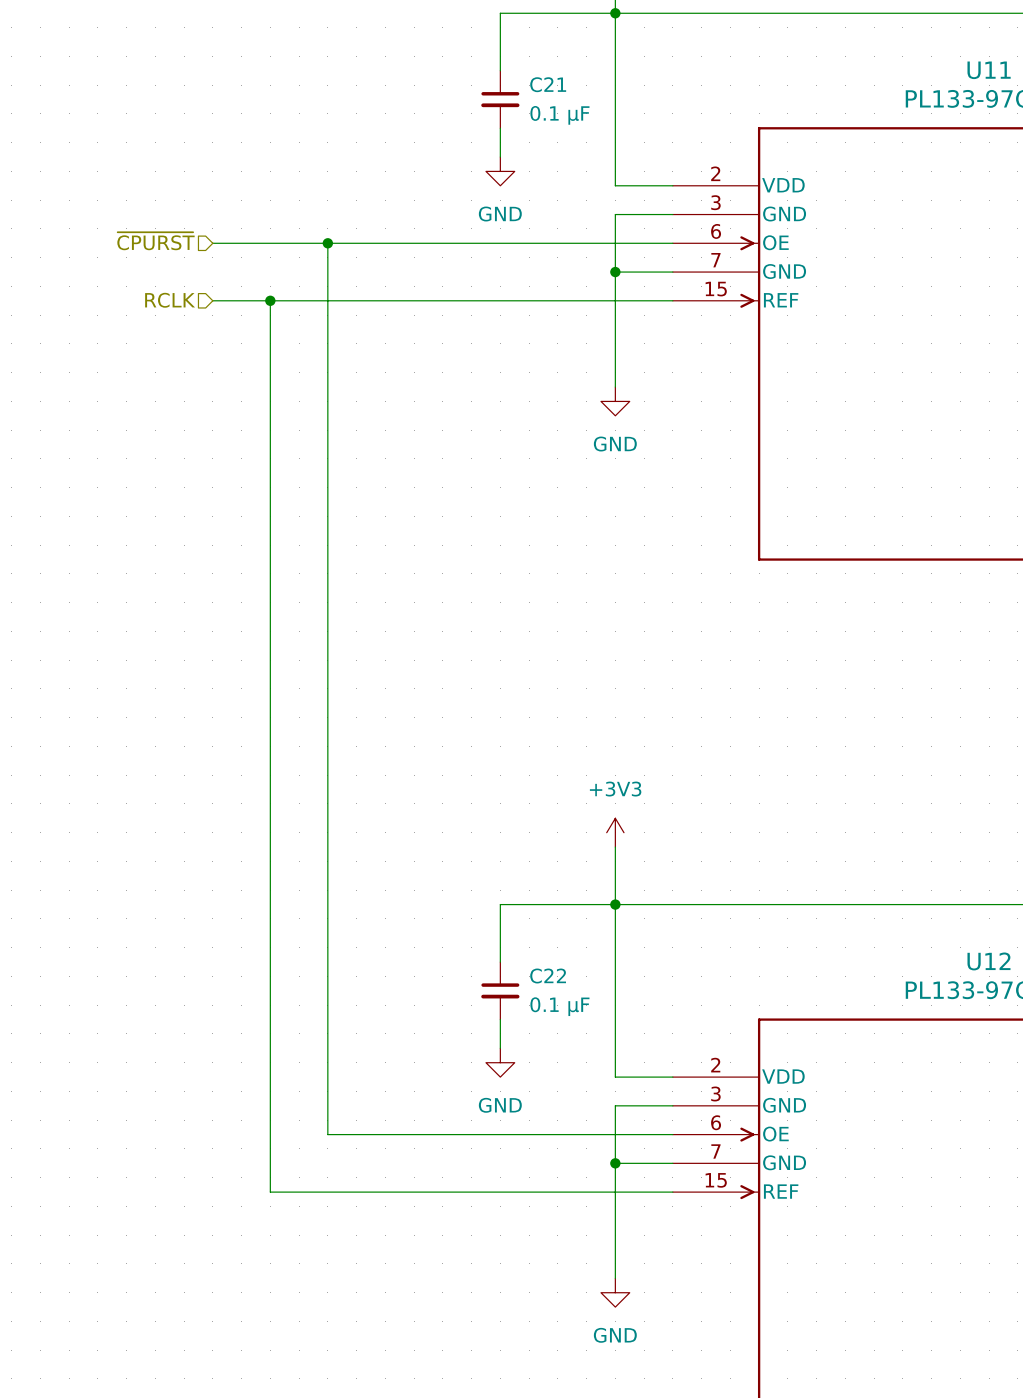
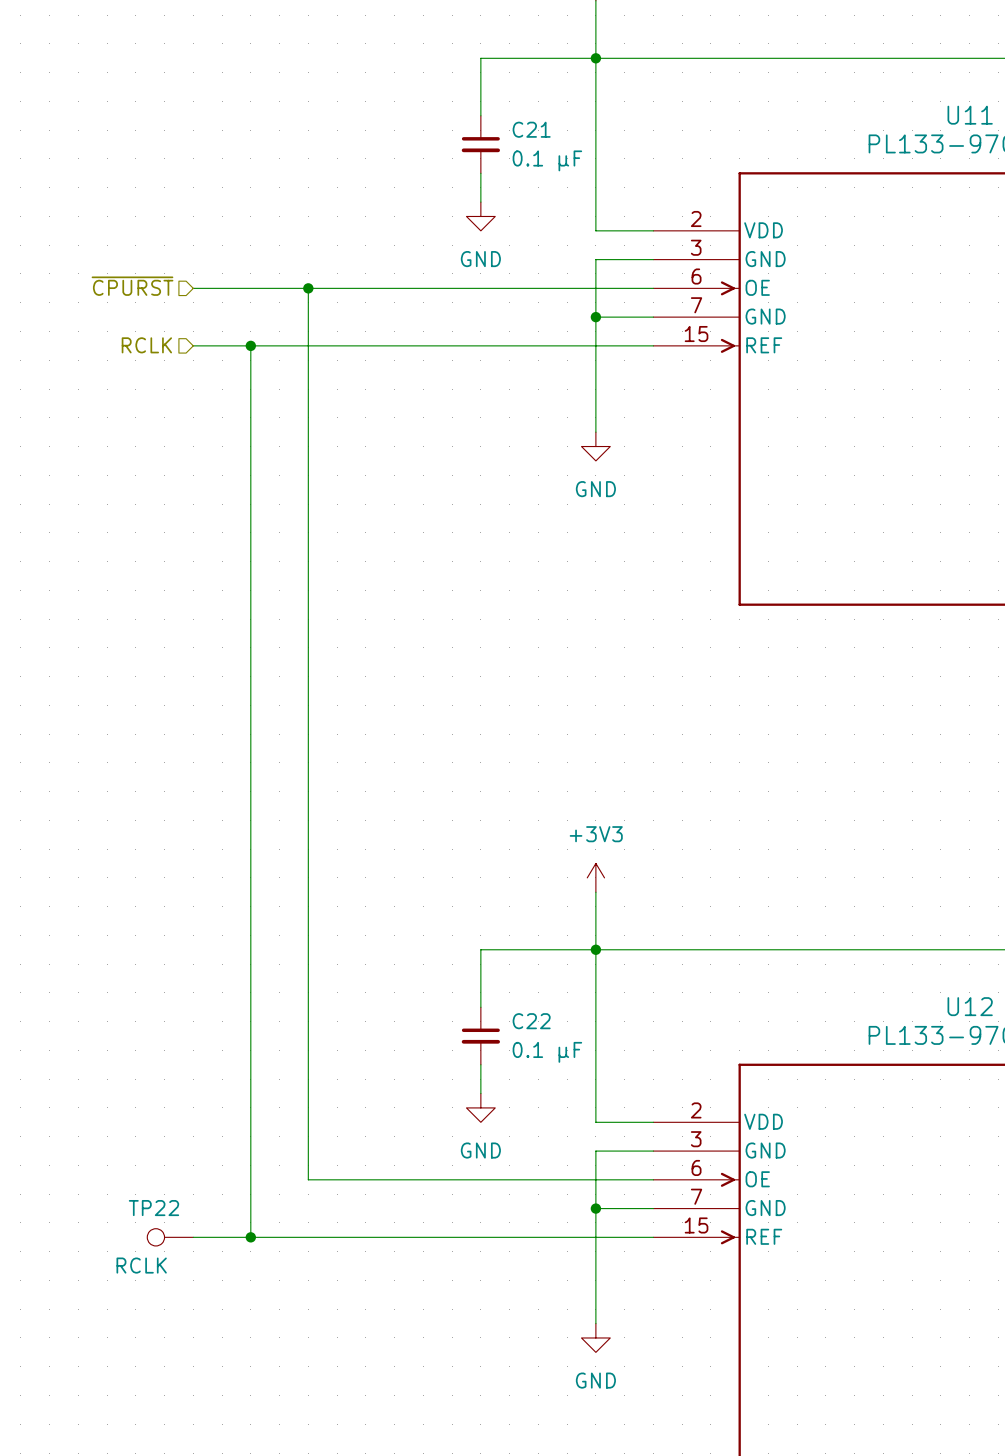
TP22: none -> RCLK (170, 1237)
wire: none -> (193, 1237) (250, 1237)
junction: none -> (250, 1237)

